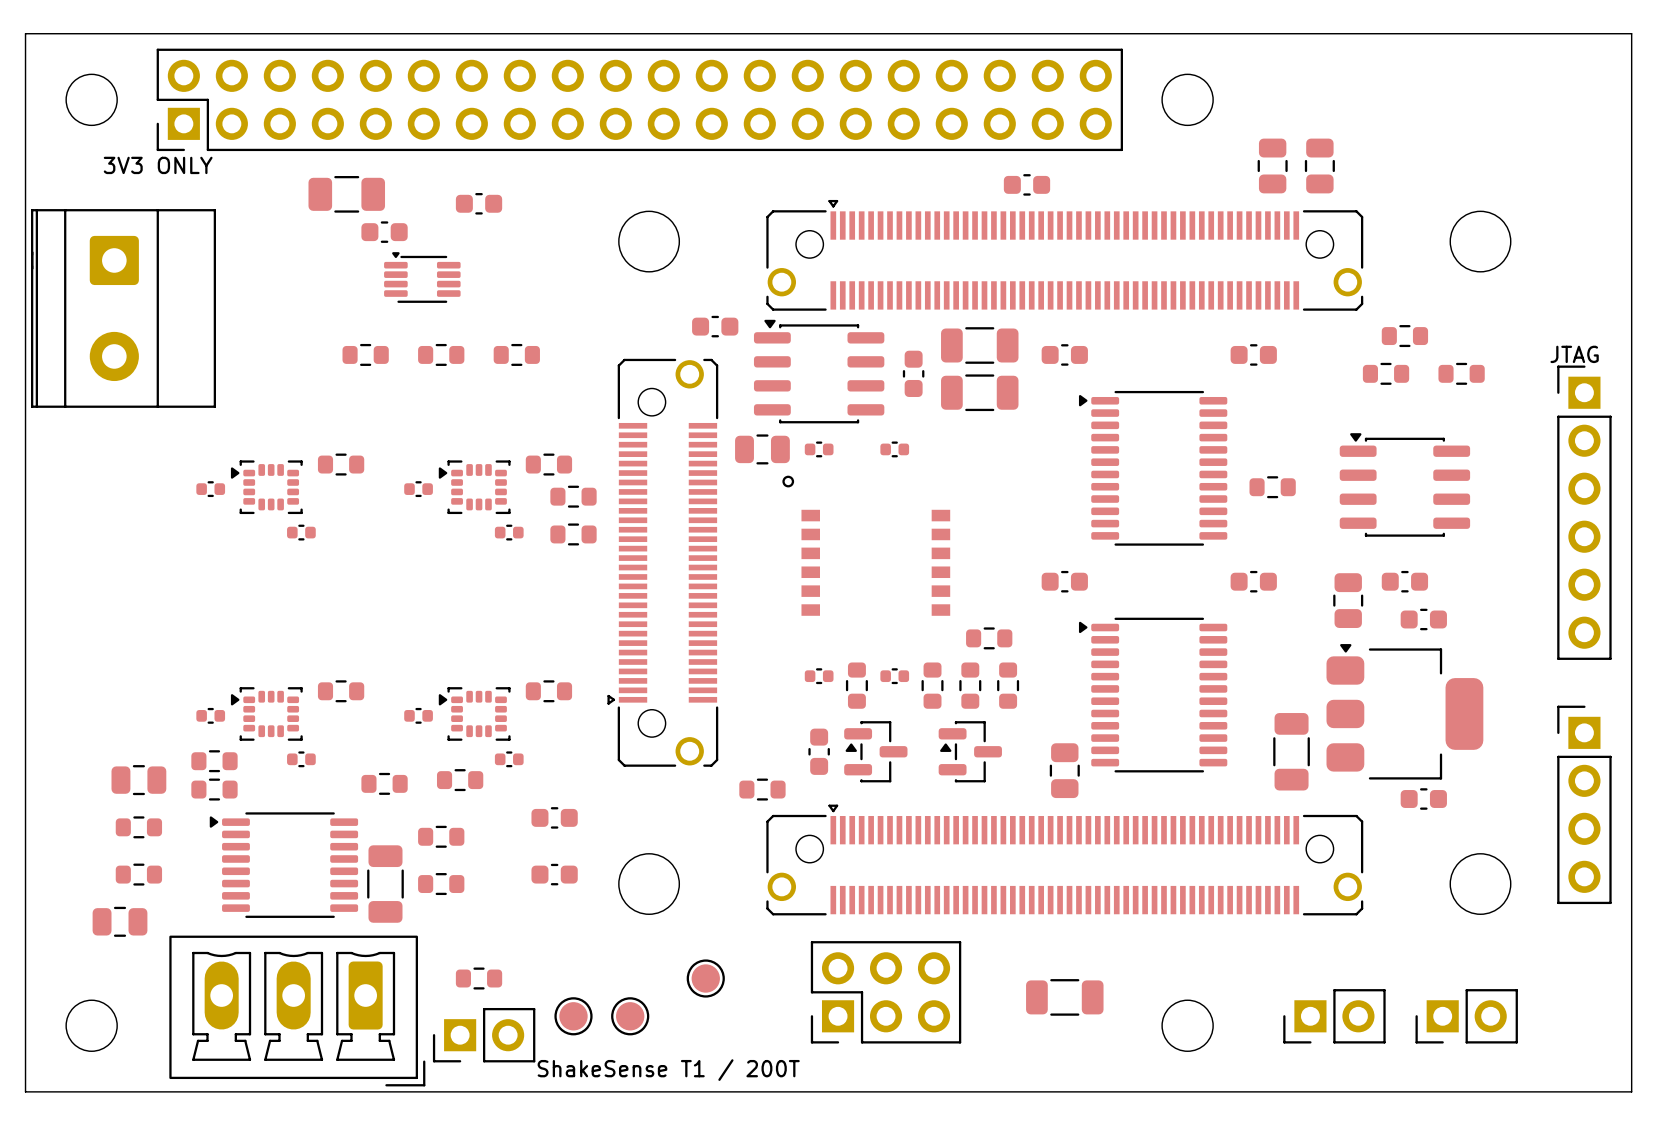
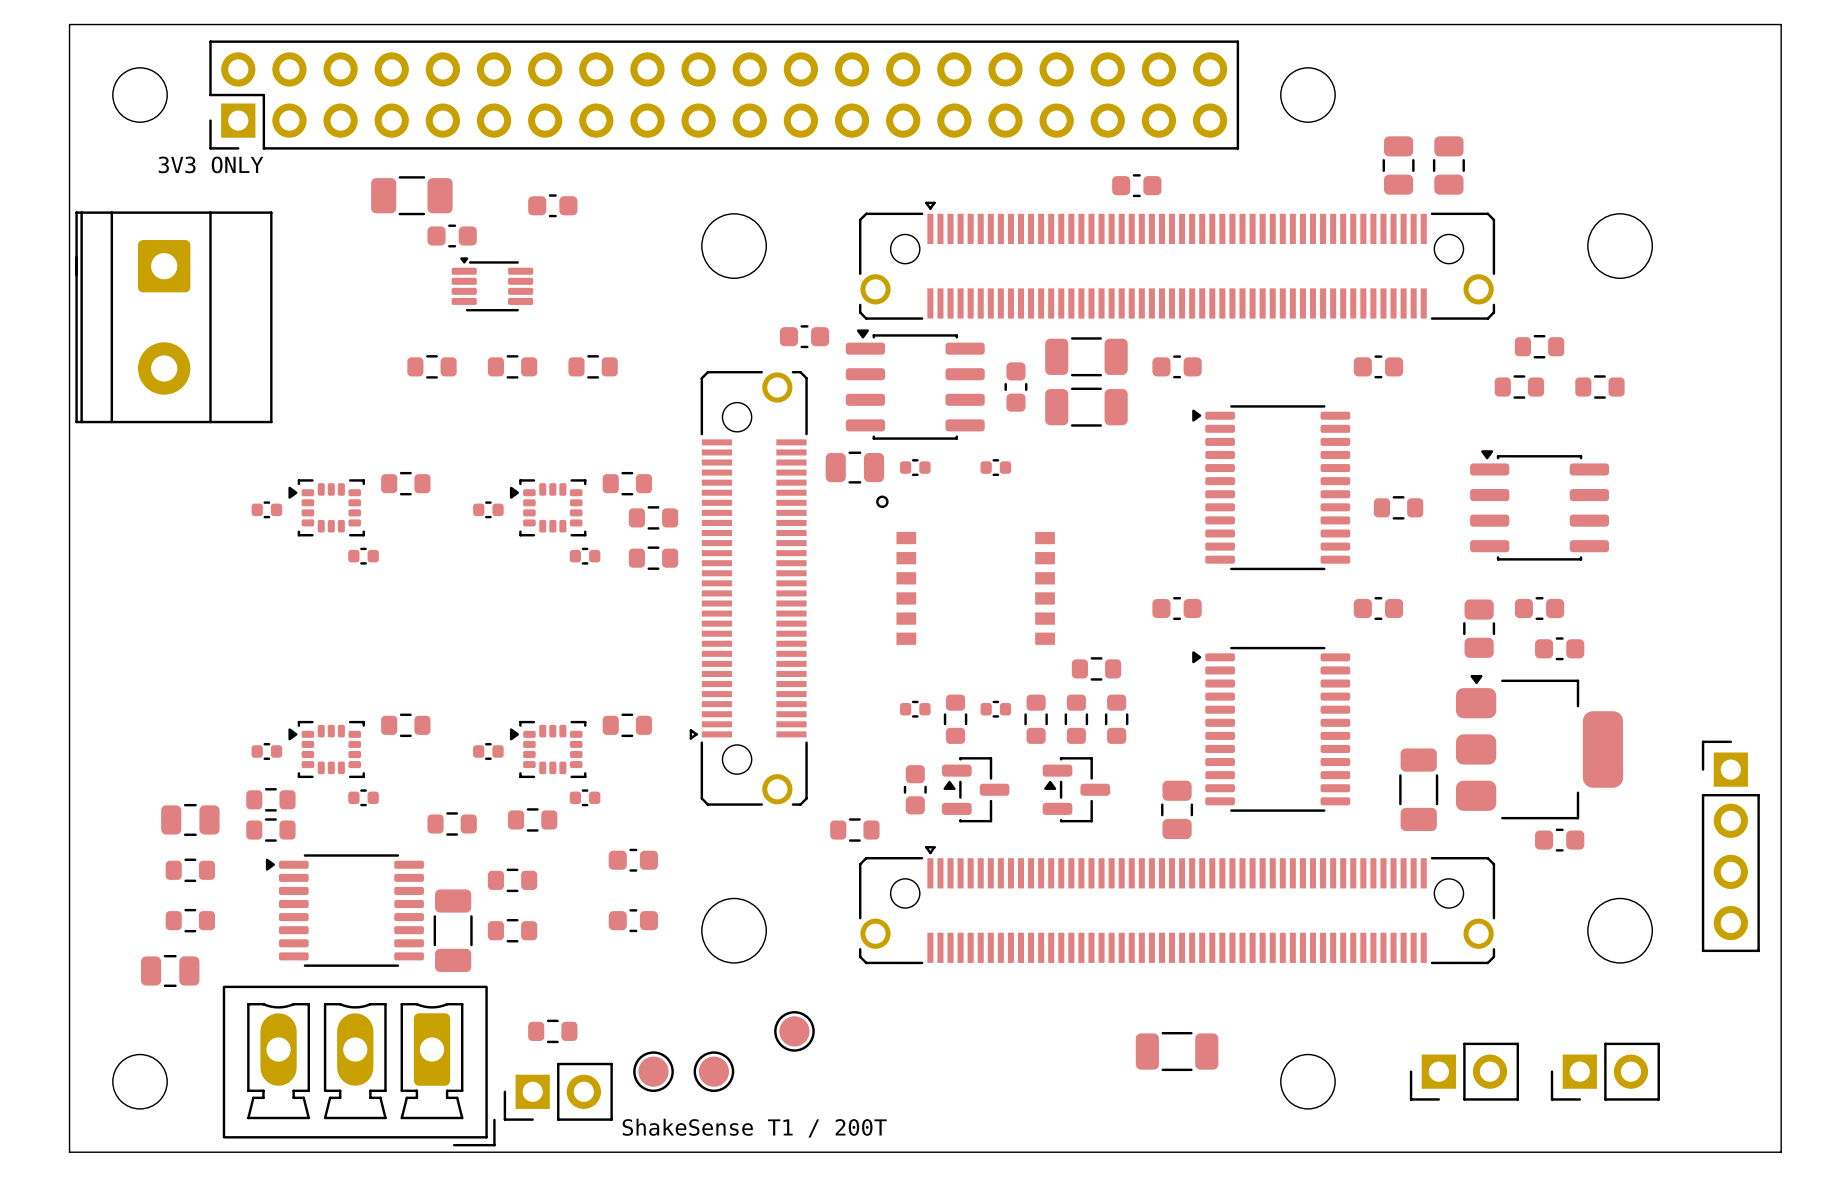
text: JTAG (1574, 354) -> none
part: (1584, 512) -> none
part: (886, 992) -> none

